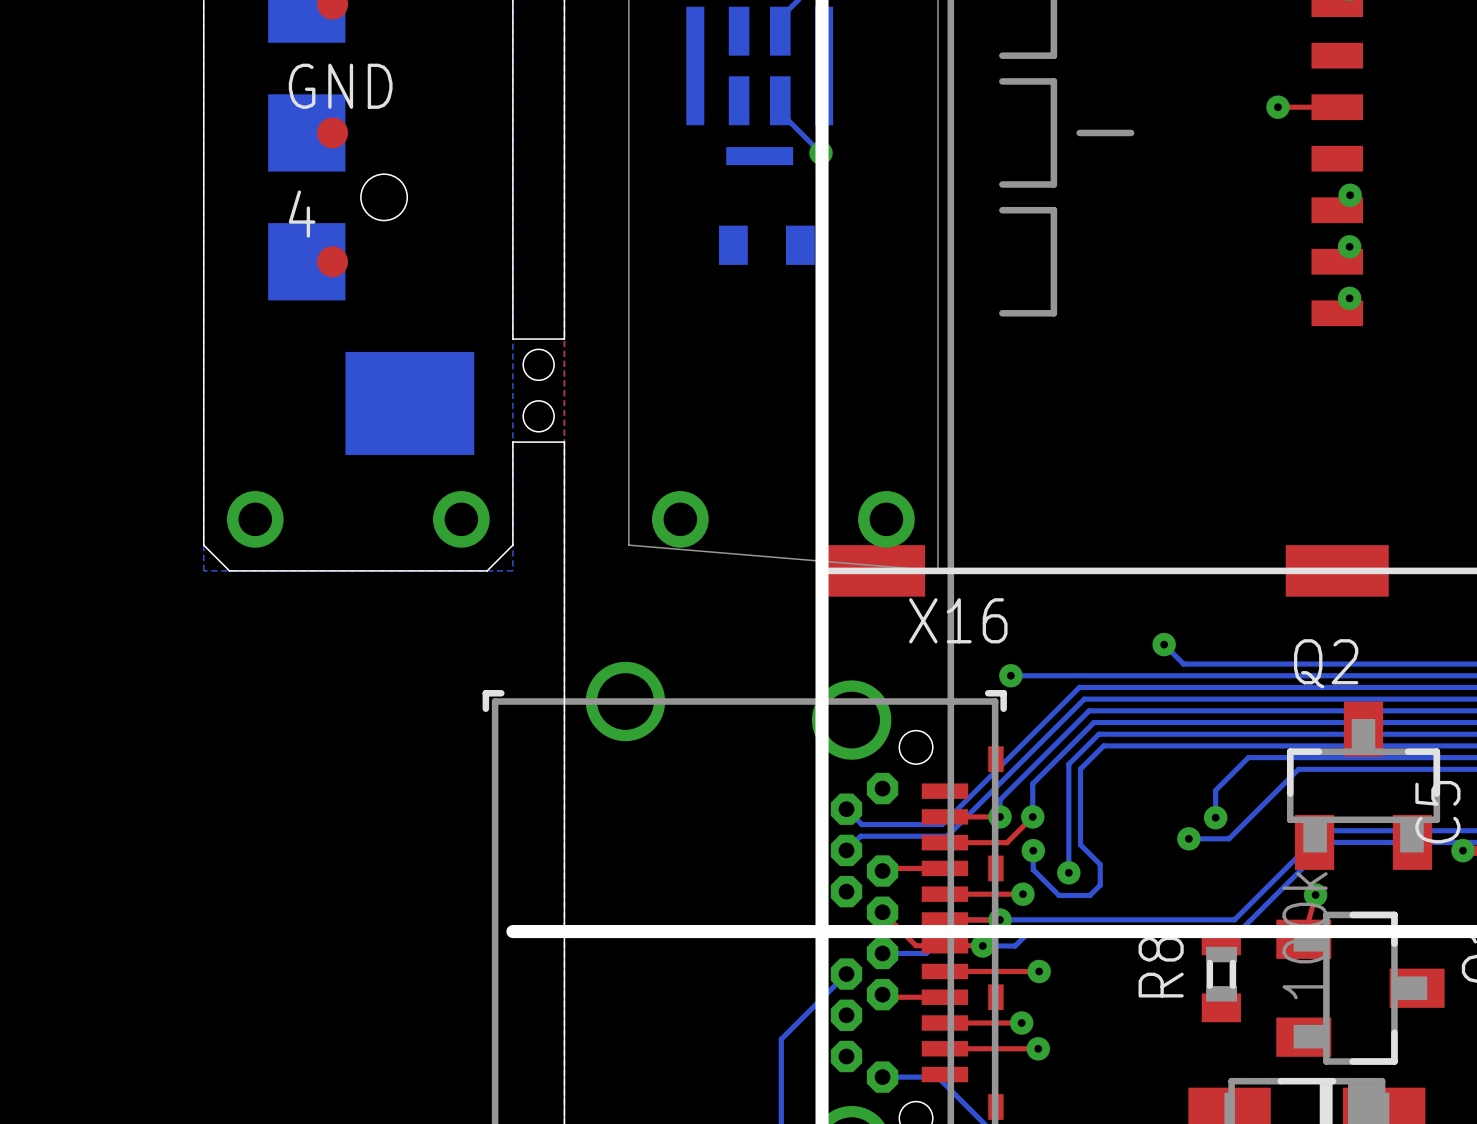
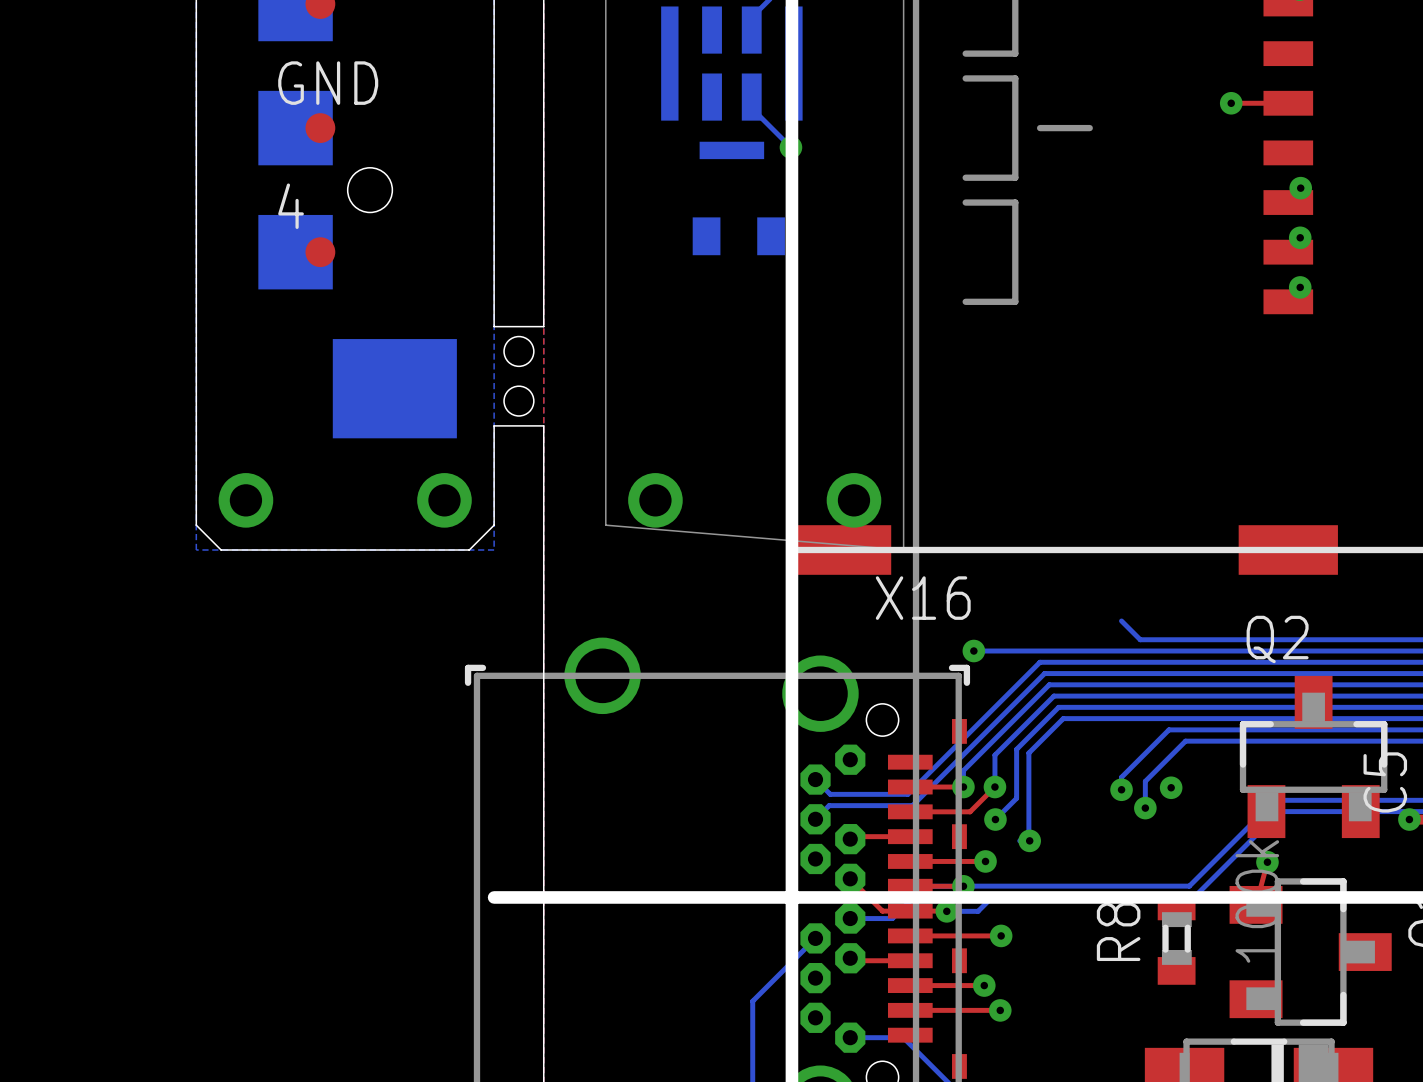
via position: (1164, 644) -> (1121, 789)
bottom track: (1248, 757) (1215, 790) (1215, 817) -> (1202, 729) (1168, 729) (1121, 777) (1121, 789)
bottom track: (1068, 764) (1068, 872) -> none
bottom track: (1080, 769) (1080, 844) (1100, 864) (1100, 885) (1089, 895) (1059, 895) (1033, 869) (1033, 850) -> (1029, 736) (1016, 749) (1016, 798) (995, 819)
bottom track: none -> (1040, 740) (1028, 753) (1028, 831) (1019, 840)
bottom track: (1298, 769) (1229, 838) (1188, 838) -> (1251, 741) (1185, 741) (1145, 781) (1145, 808)

